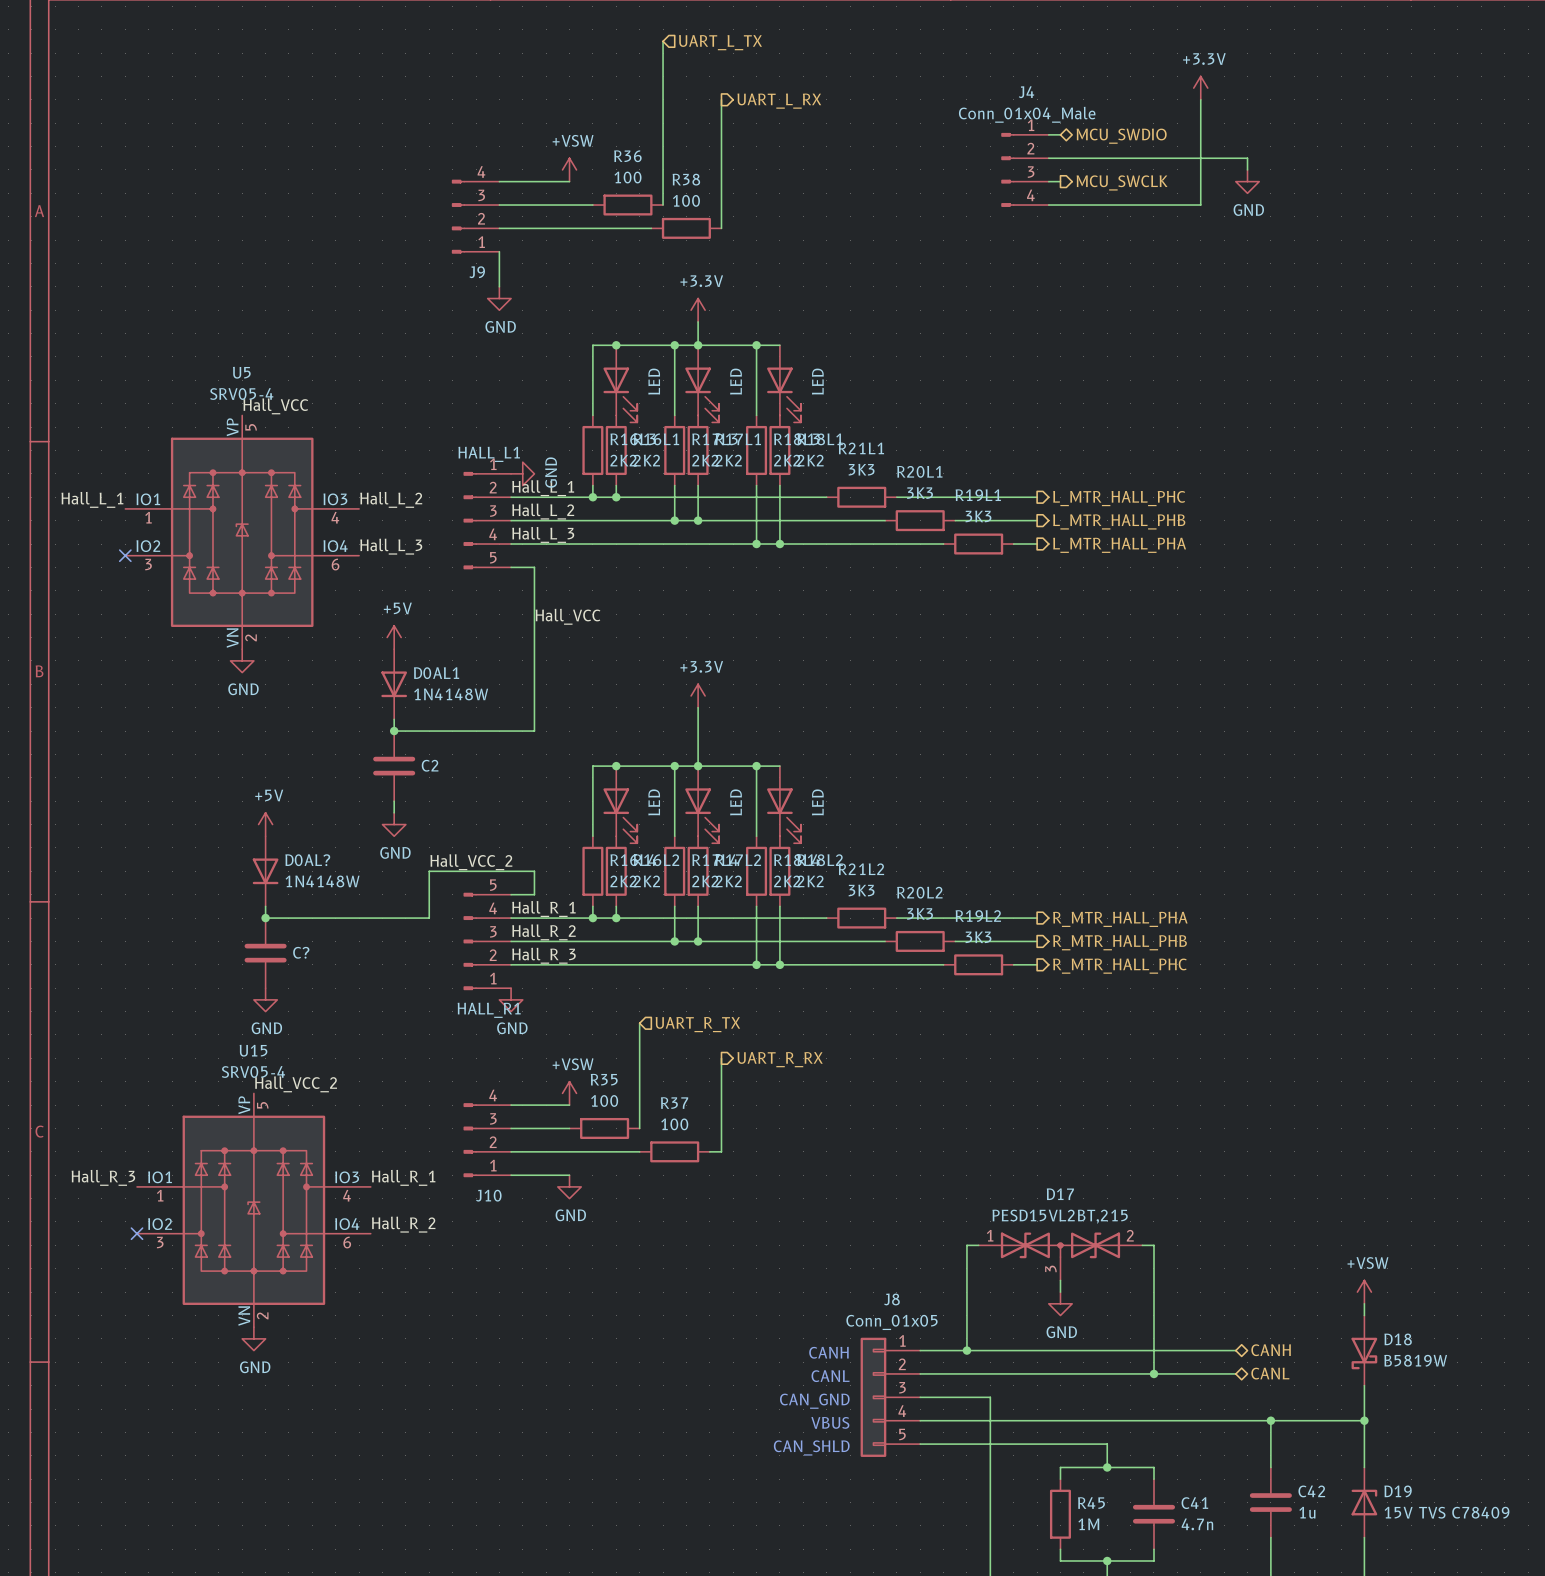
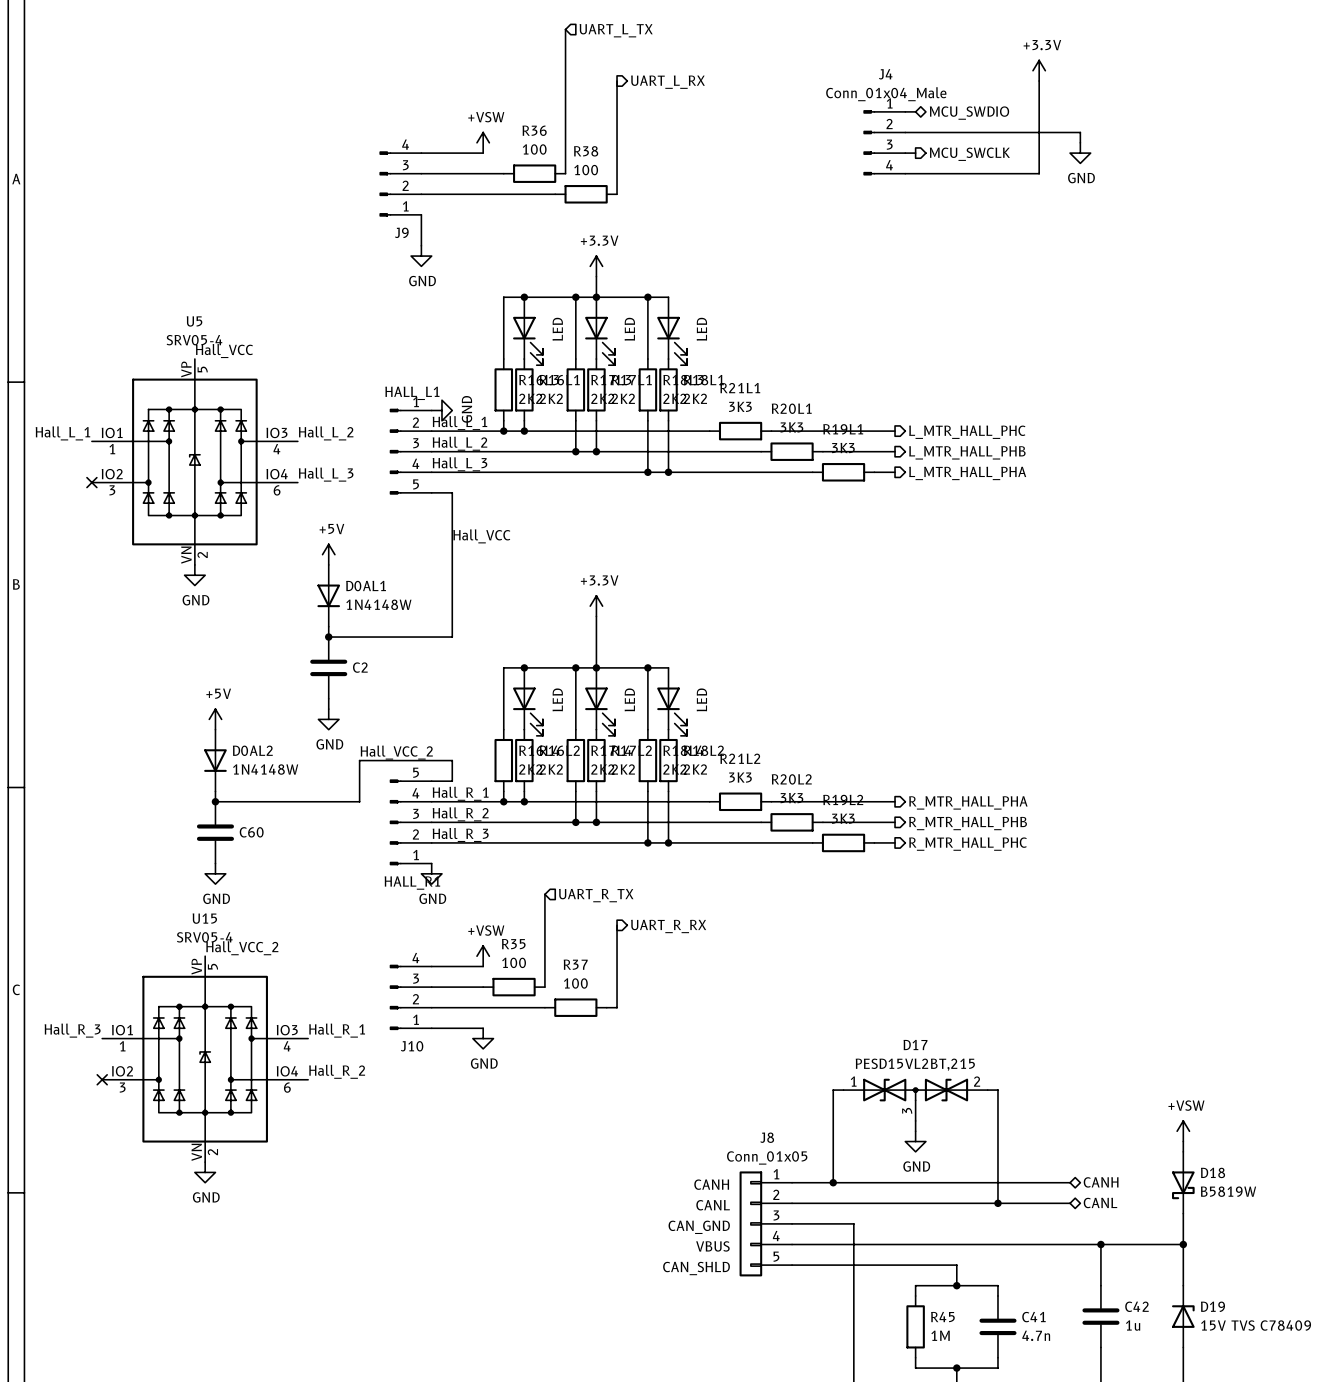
D0AL? name: D0AL? (307, 860) -> D0AL2 (252, 750)
C? name: C? (301, 952) -> C60 (251, 832)

